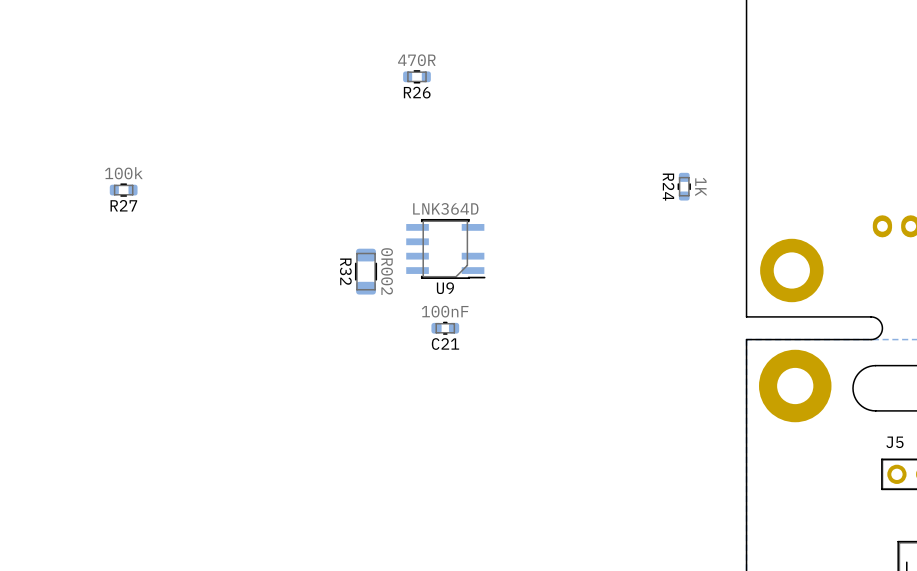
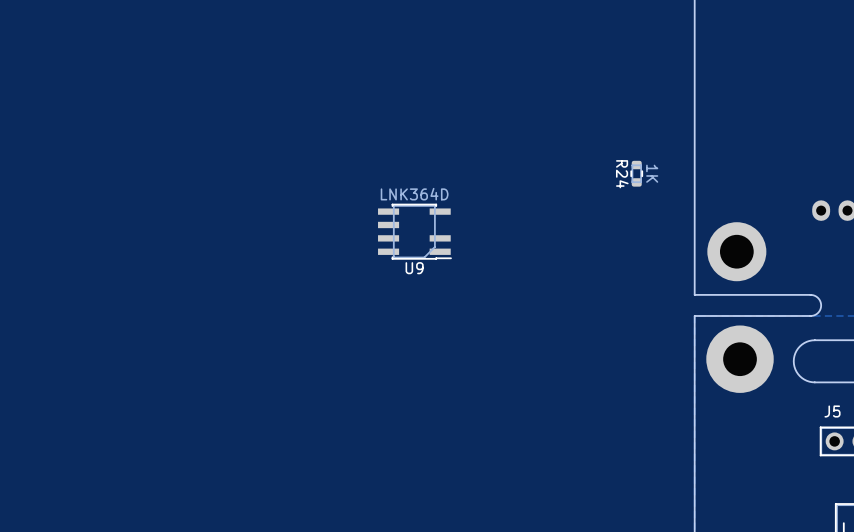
R26: 470R (416, 76) -> none
R27: 100k (123, 190) -> none
R32: 0R002 (366, 271) -> none
C21: 100nF (445, 328) -> none

